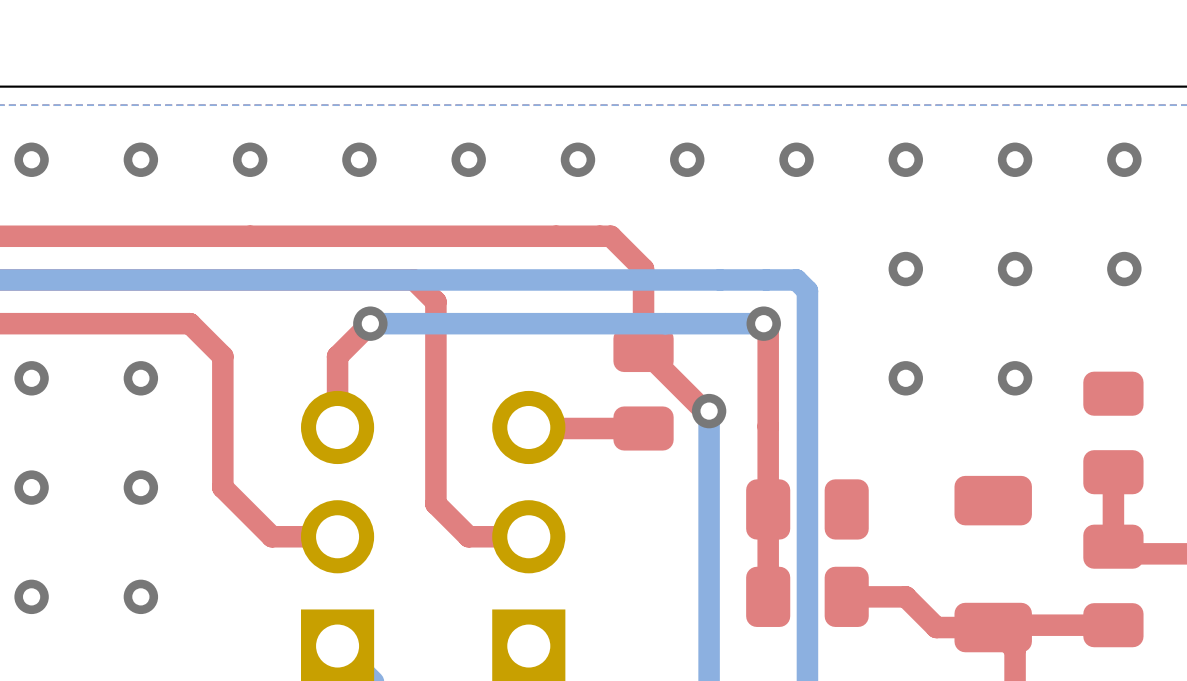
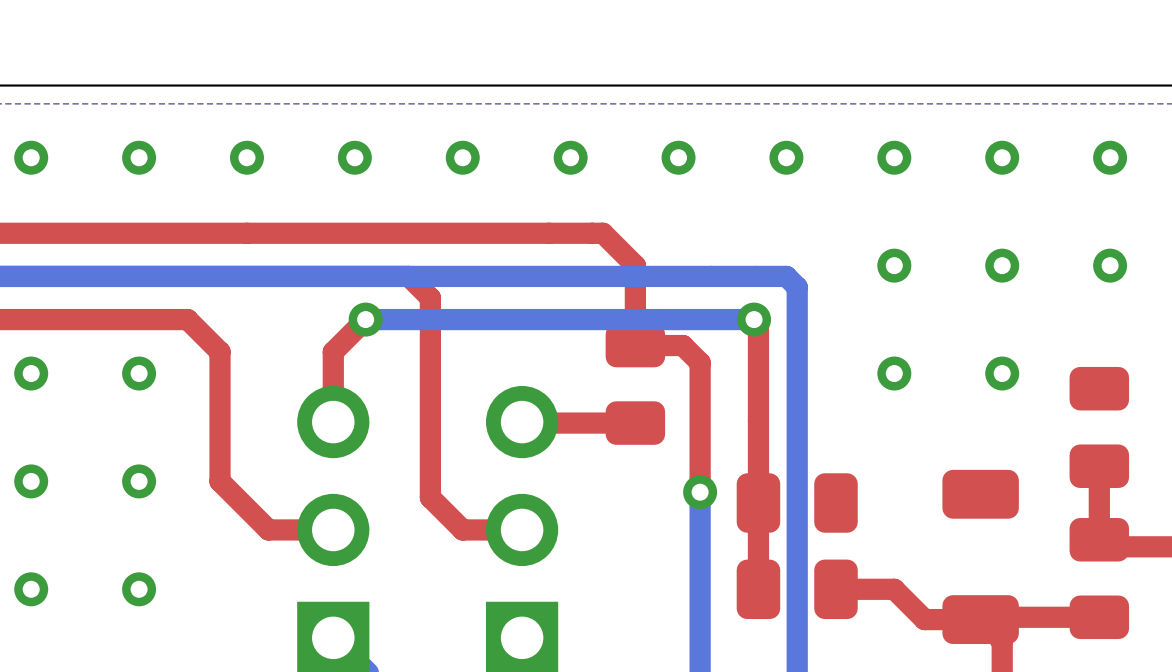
top track: (643, 349) (704, 411) (709, 411) -> none
top track: none -> (650, 345) (682, 345) (700, 362) (700, 492)
bottom track: (709, 411) (709, 498) -> none
via position: (709, 411) -> (700, 492)

